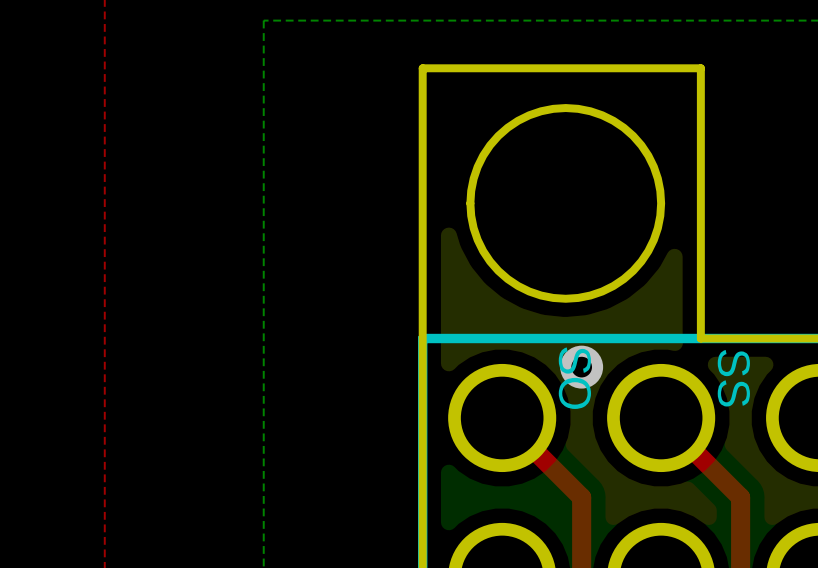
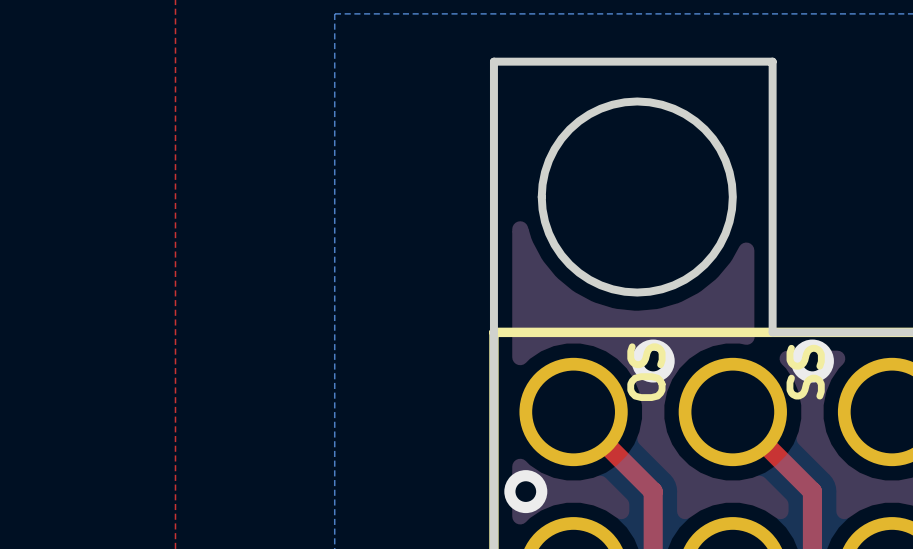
via: none -> (812, 361)
via: none -> (525, 491)

